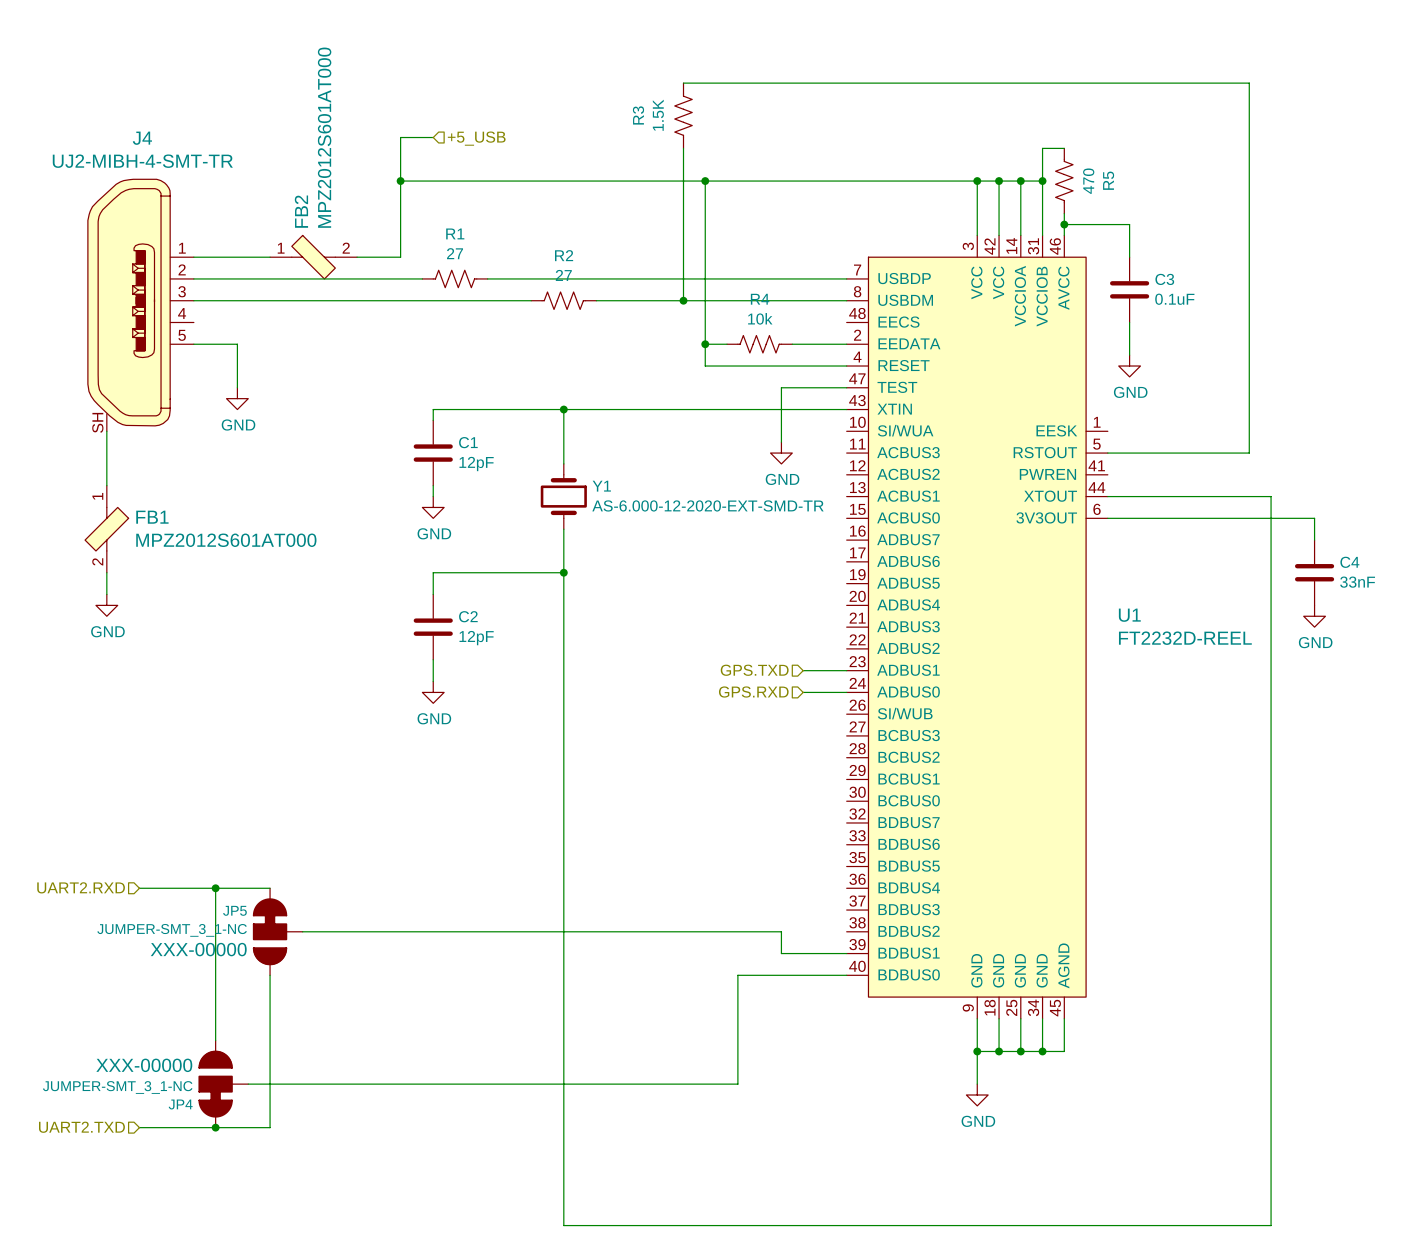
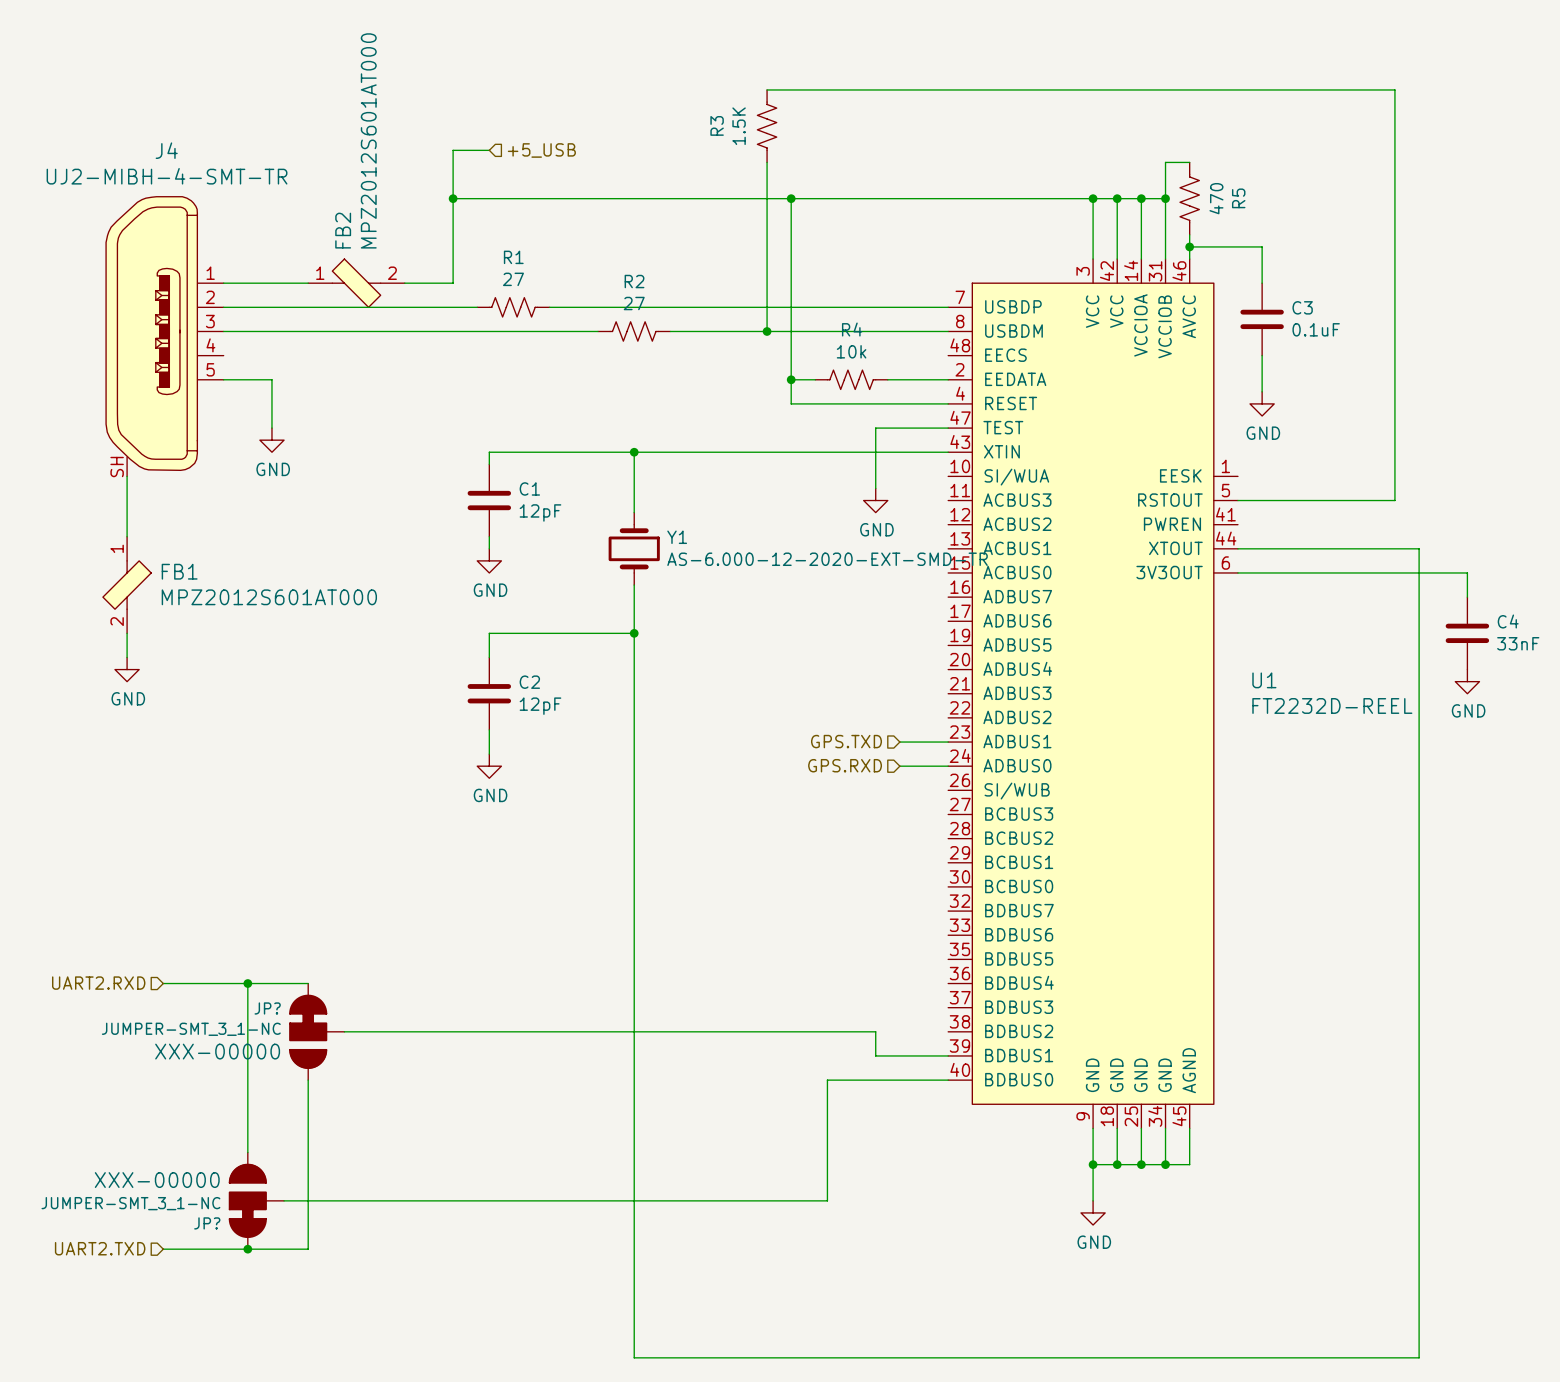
JP5 name: JP5 (234, 910) -> JP? (267, 1008)
JP4 name: JP4 (180, 1104) -> JP? (207, 1223)

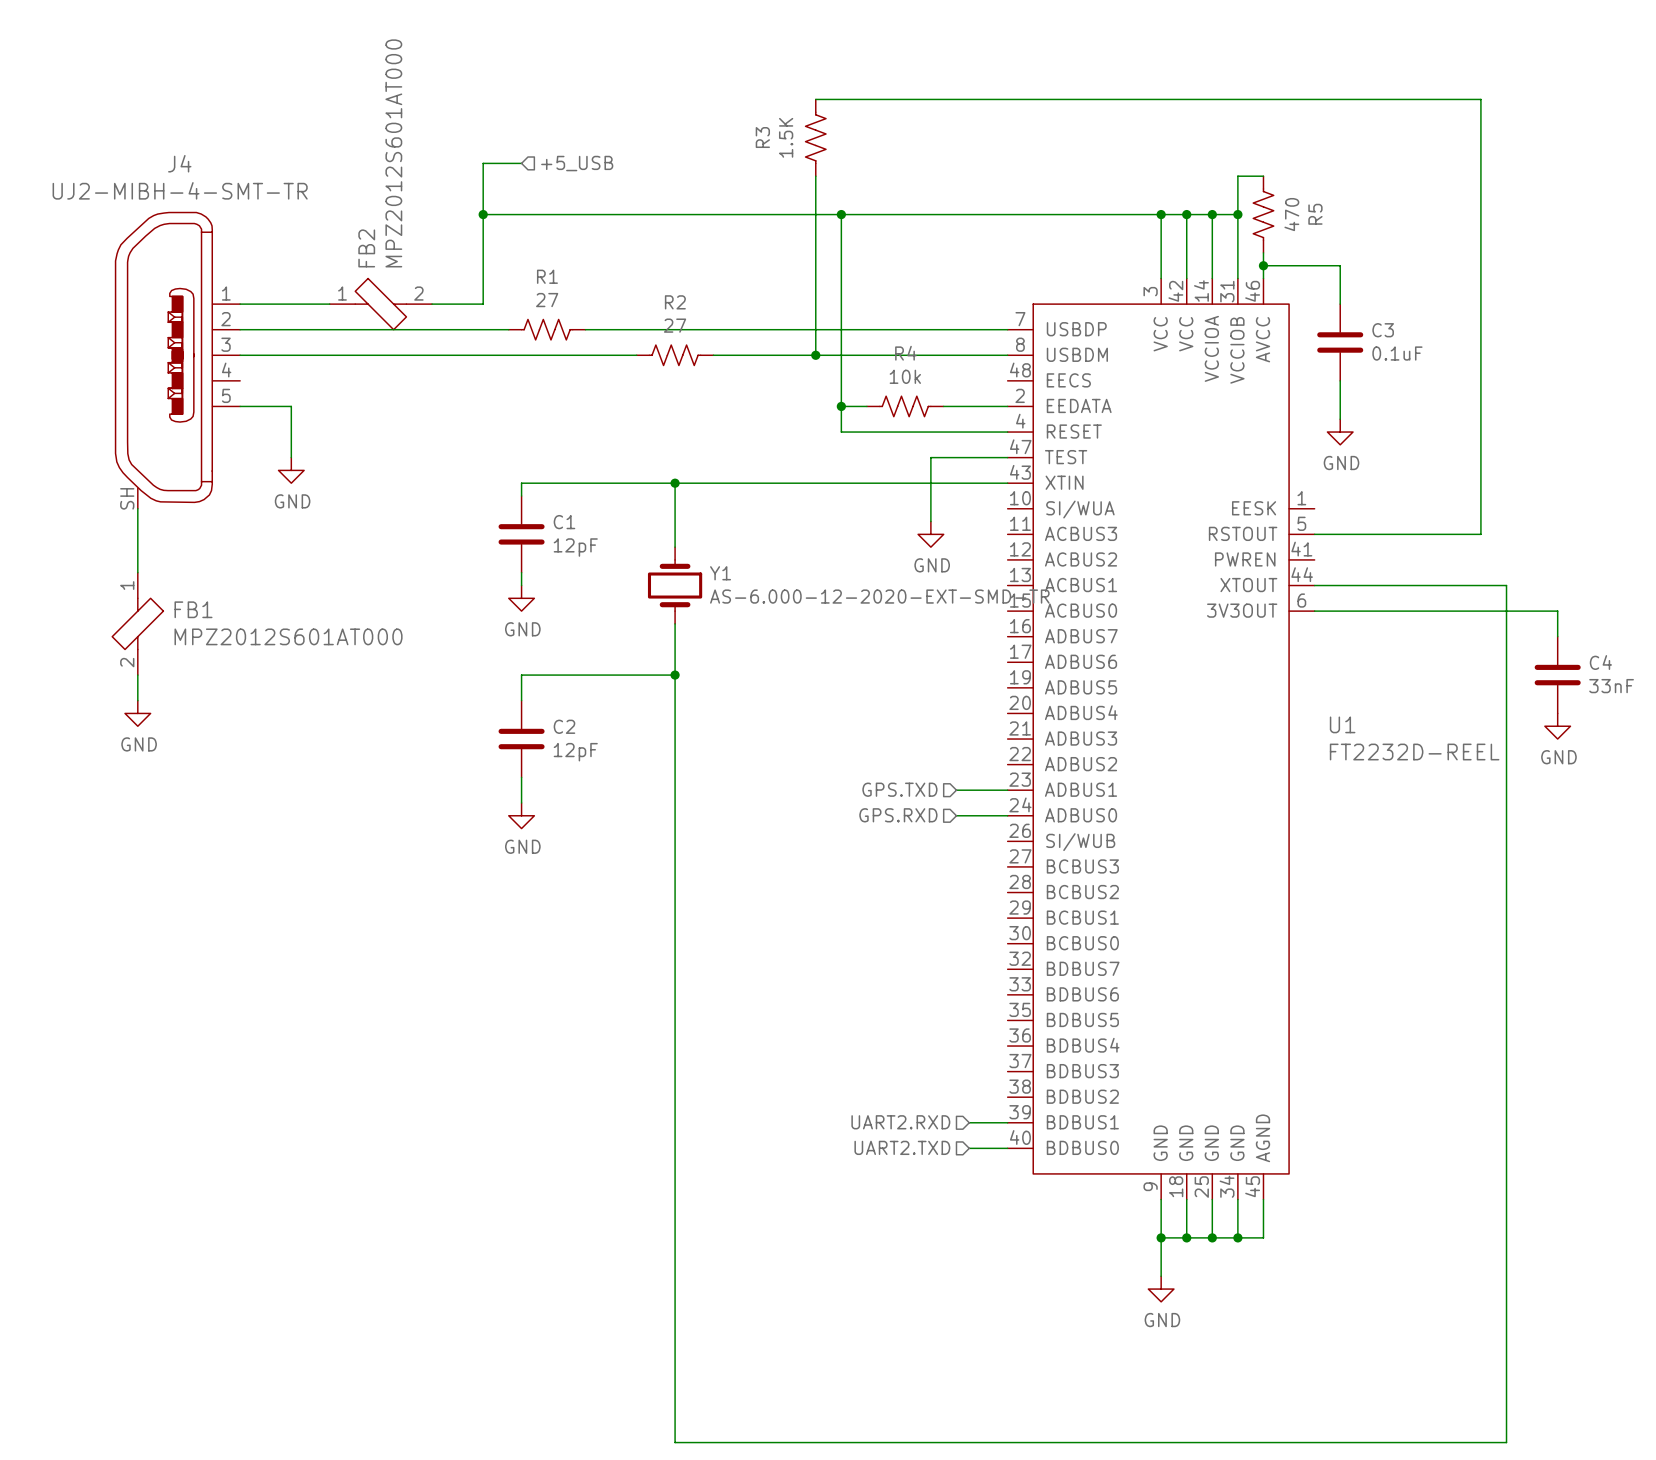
hierarchical label: UART2.RXD (98, 983) -> none
wire: (163, 983) (308, 983) -> none
wire: (247, 983) (247, 1152) -> none
junction: (247, 983) -> none
JP?: JUMPER-SMT_3_1-NC (316, 1031) -> none
wire: (344, 1031) (875, 1031) (875, 1055) (911, 1055) -> none
hierarchical label: none -> UART2.RXD (900, 1122)
hierarchical label: none -> UART2.TXD (902, 1147)
wire: (308, 1080) (308, 1249) (163, 1249) -> none
wire: (911, 1080) (827, 1080) (827, 1200) (284, 1200) -> none
JP?: JUMPER-SMT_3_1-NC (256, 1200) -> none
hierarchical label: UART2.TXD (100, 1248) -> none
junction: (247, 1249) -> none

